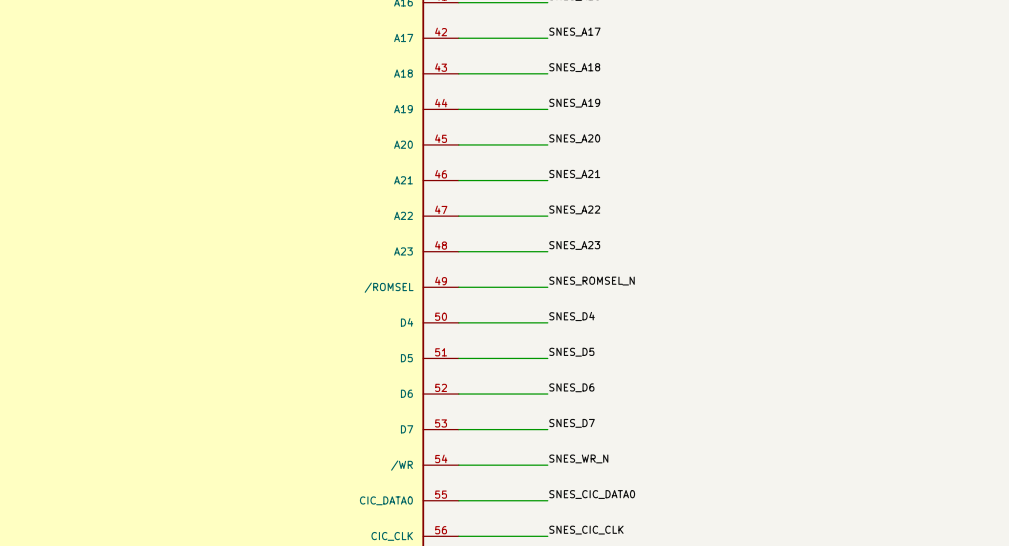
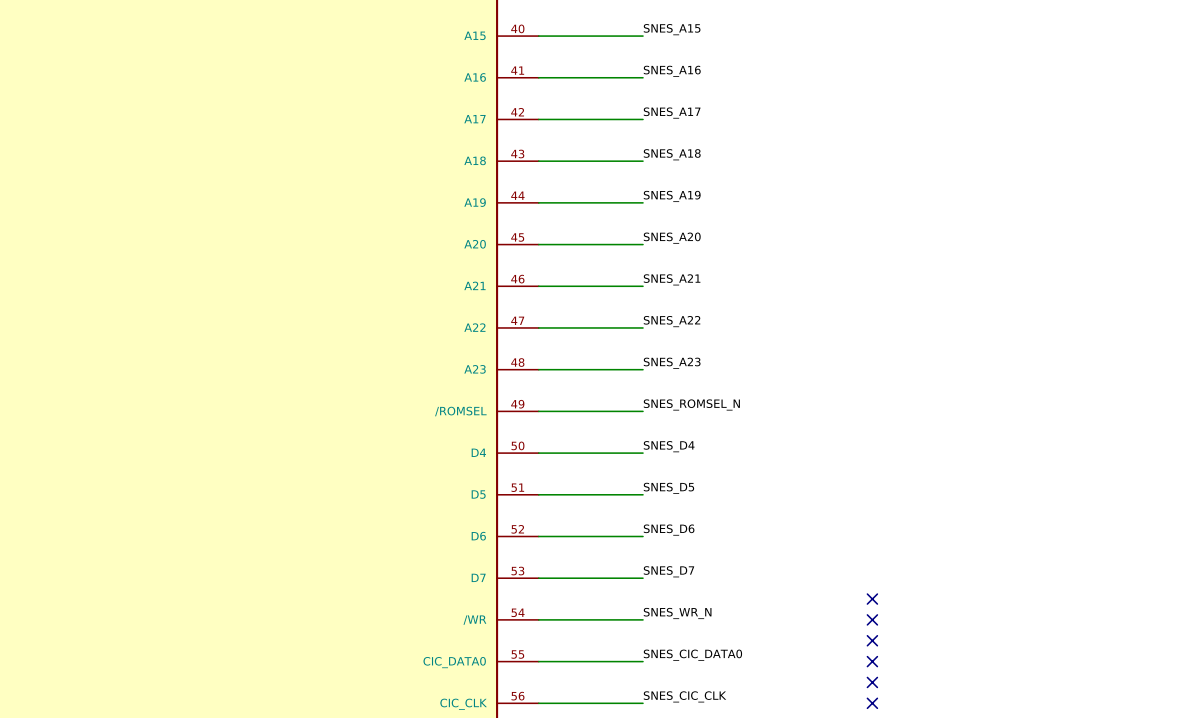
no-connect mark: none -> (872, 599)
no-connect mark: none -> (872, 619)
no-connect mark: none -> (872, 640)
no-connect mark: none -> (872, 661)
no-connect mark: none -> (872, 682)
no-connect mark: none -> (872, 703)

